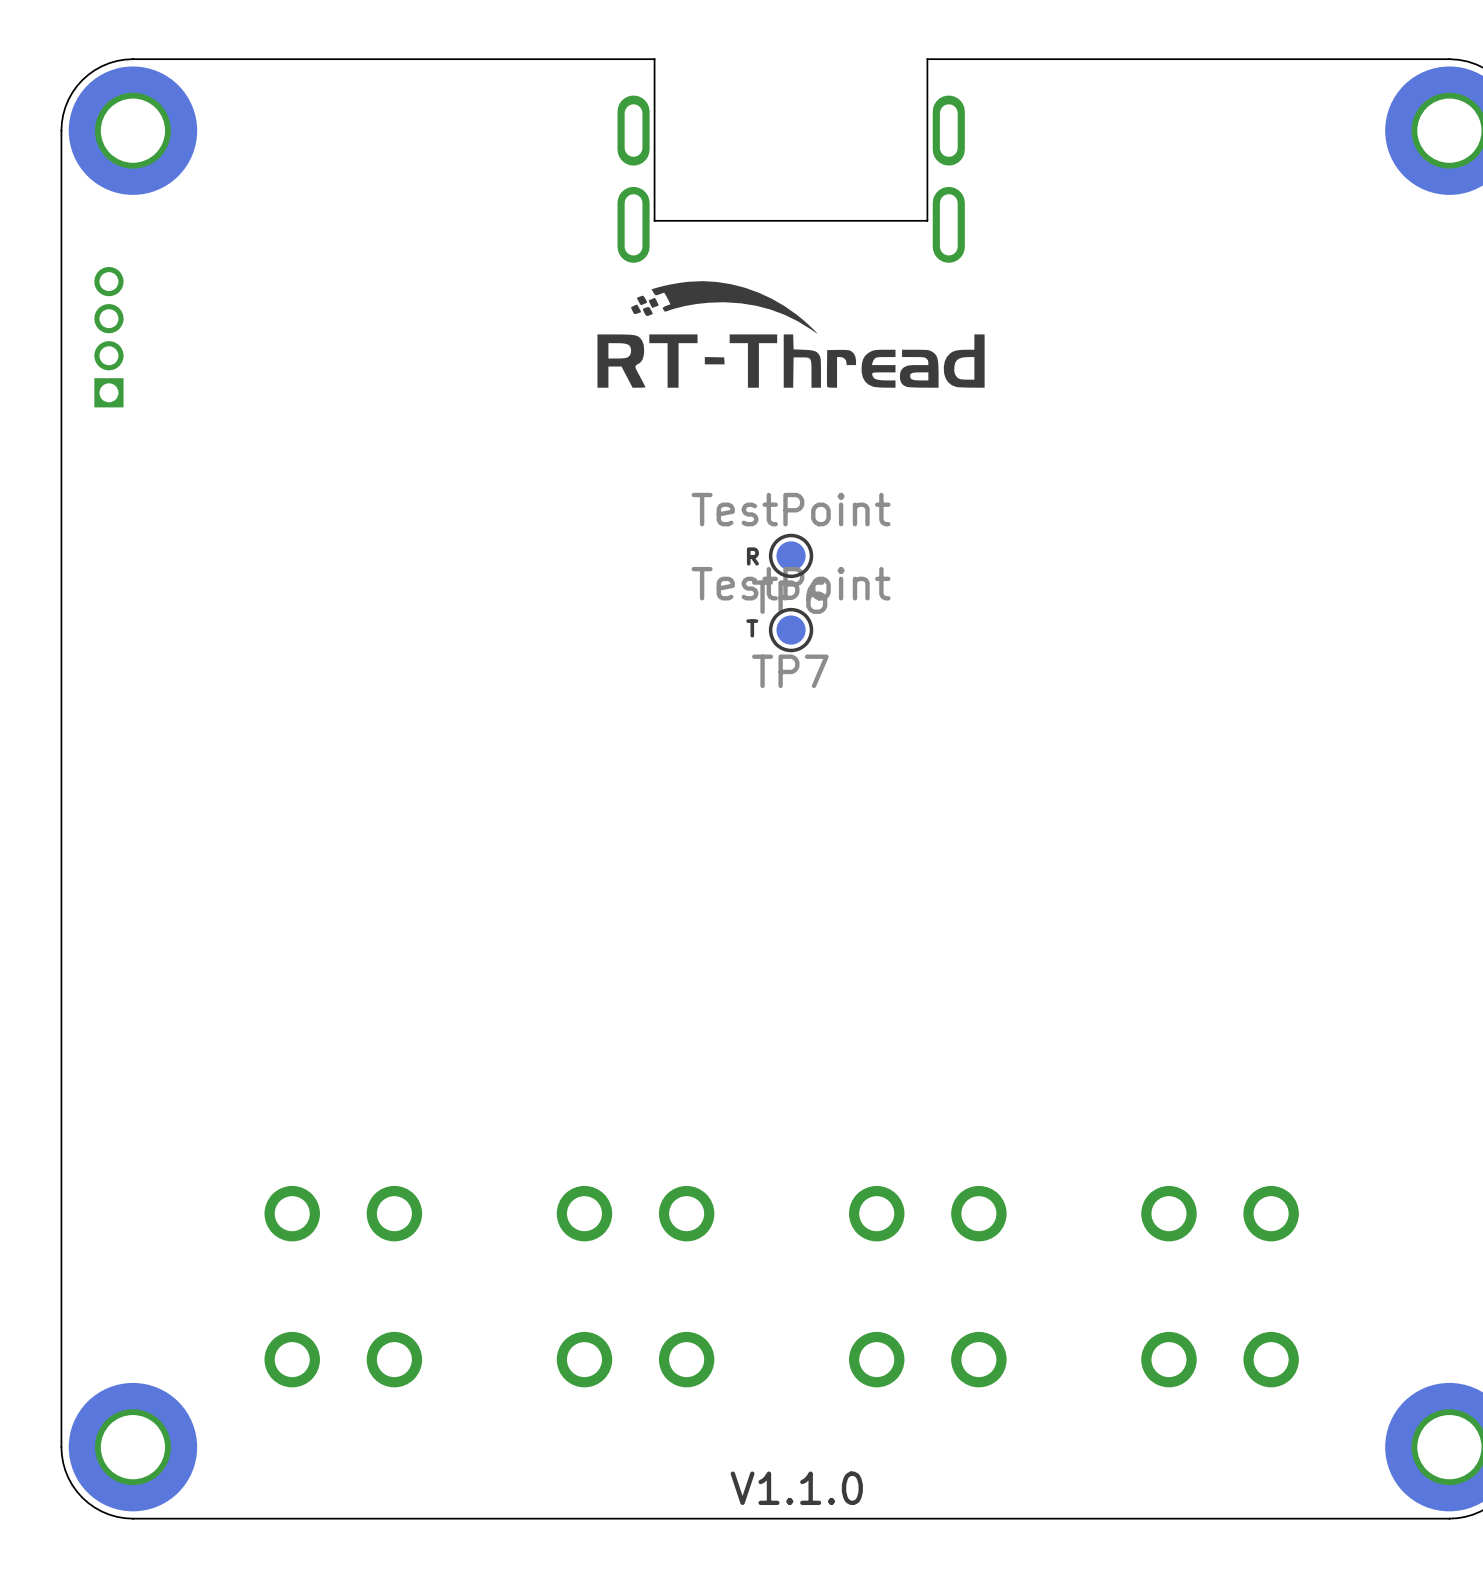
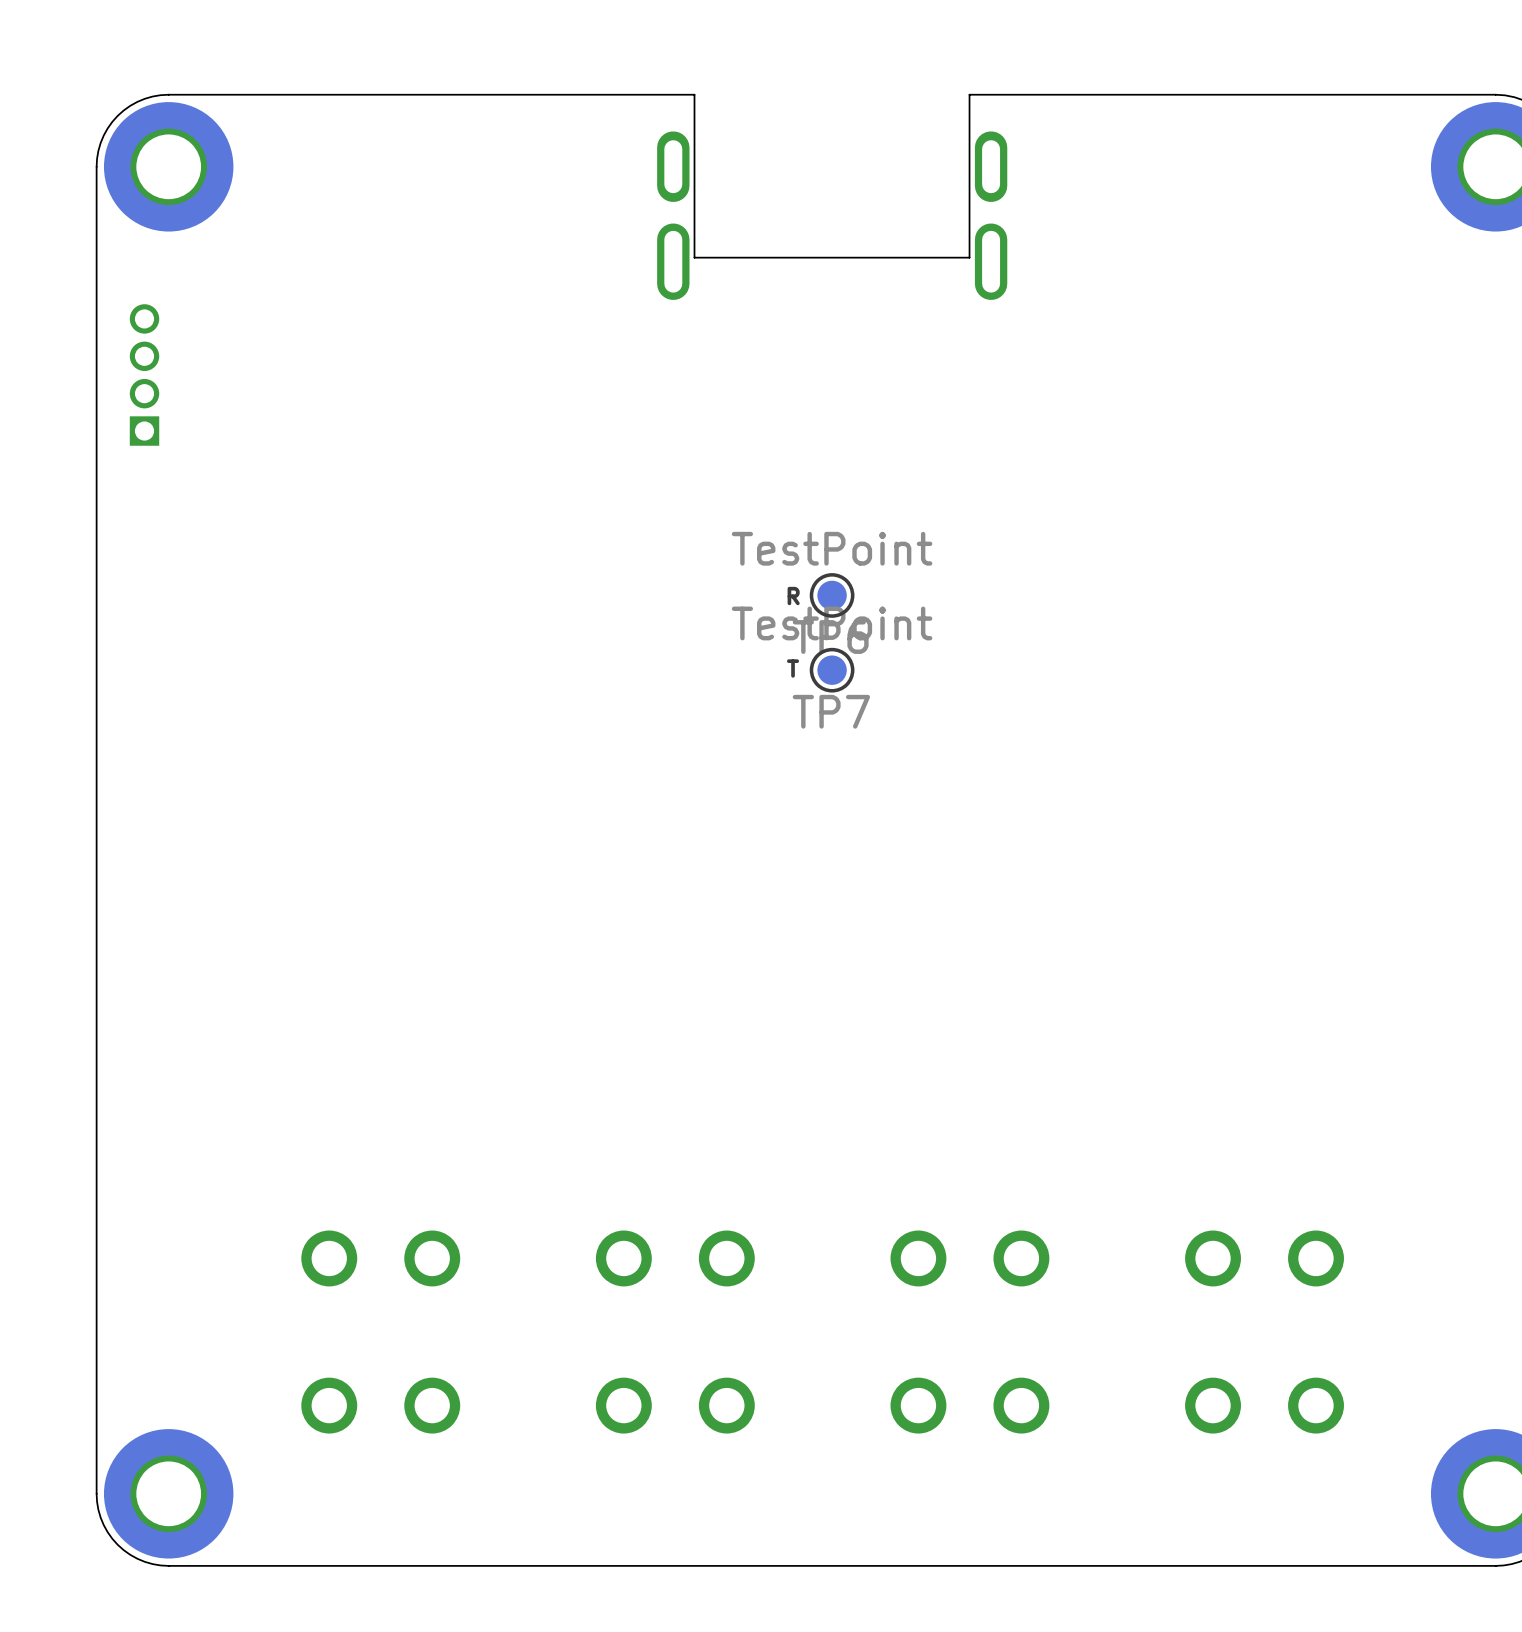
drawing: [597, 281, 985, 388] -> none
text: V1.1.0 (796, 1488) -> none

